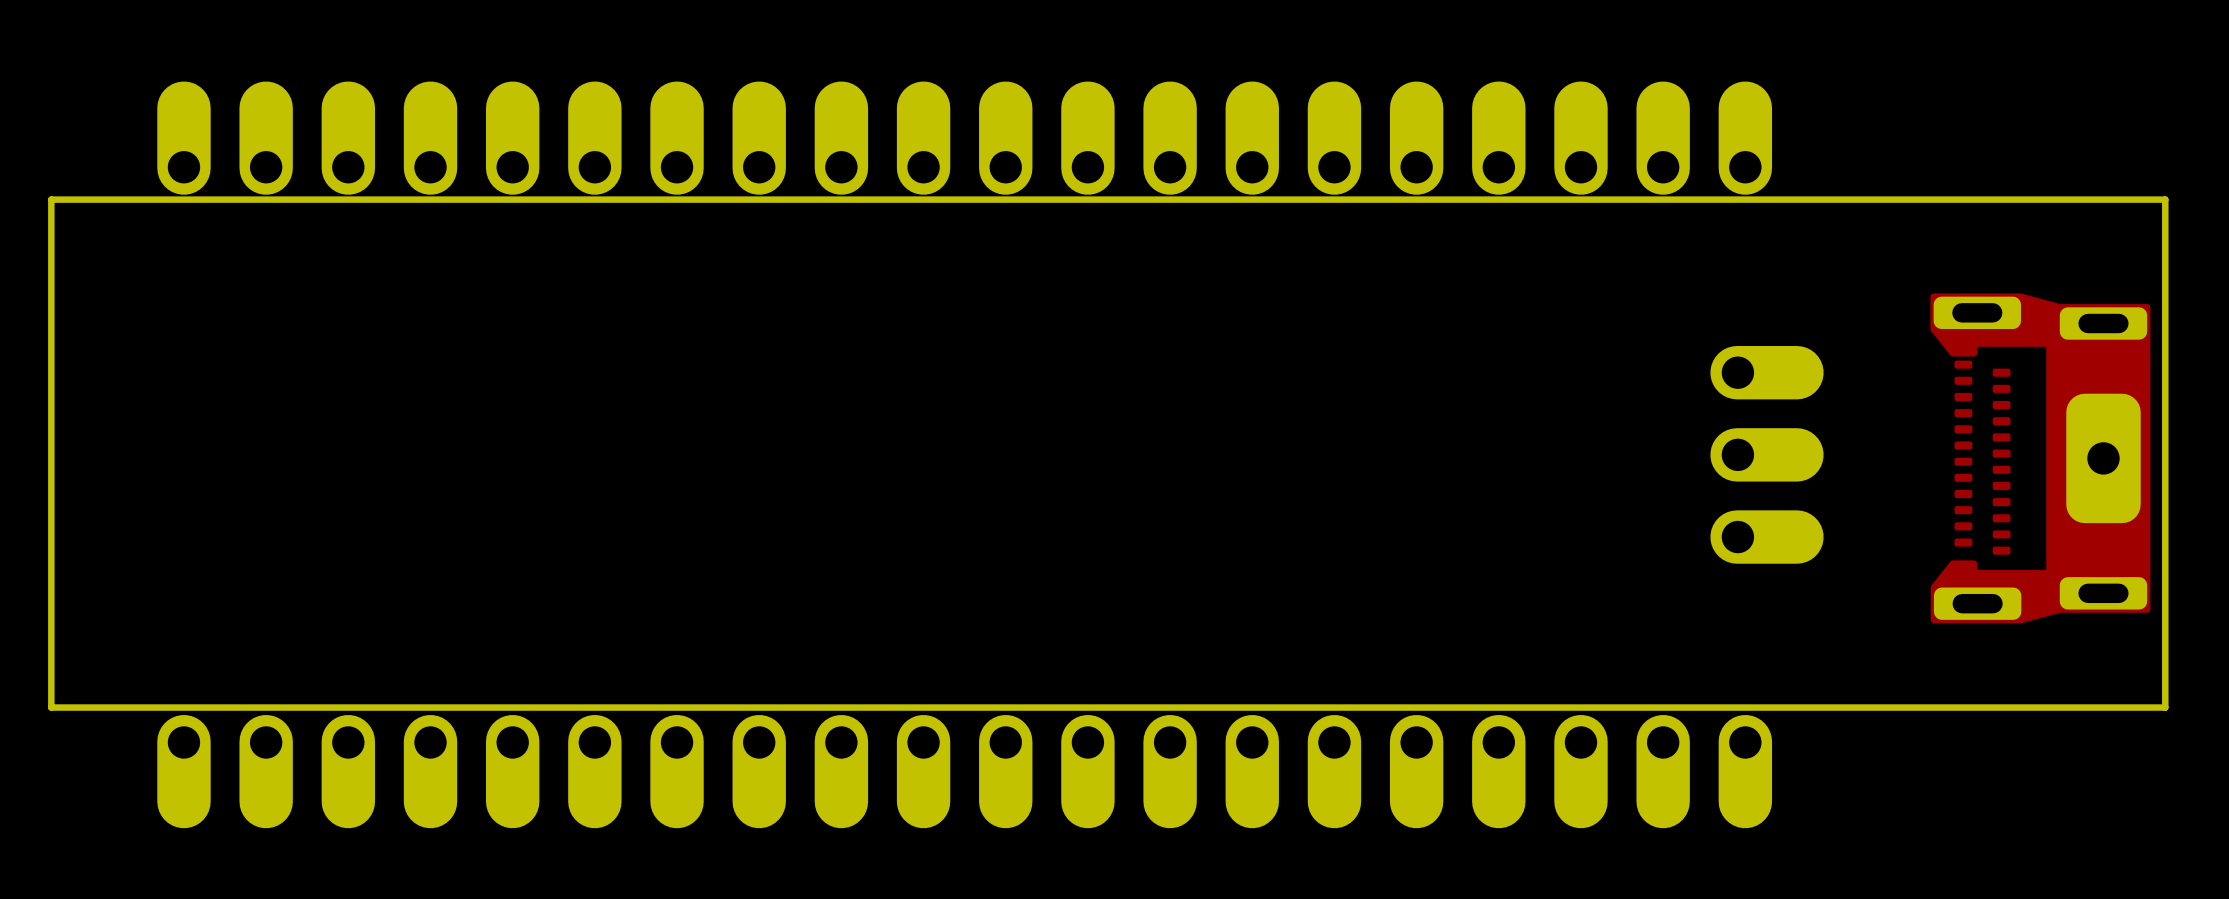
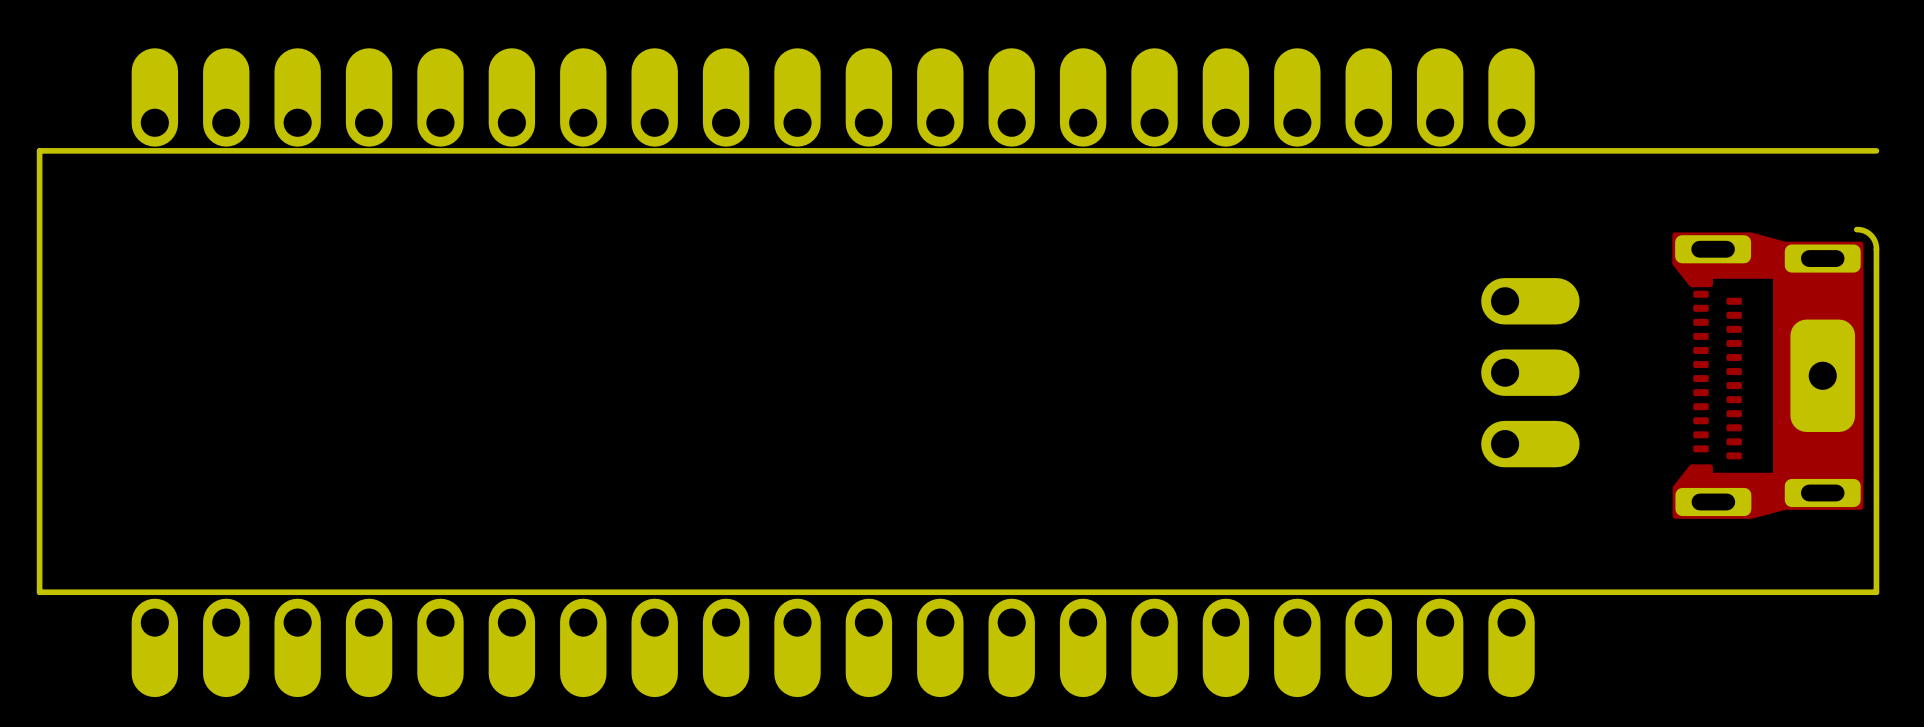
board edge: (2165, 199) (2165, 312) -> (1856, 229) (1865, 231) (1870, 235) (1874, 240) (1876, 249)

